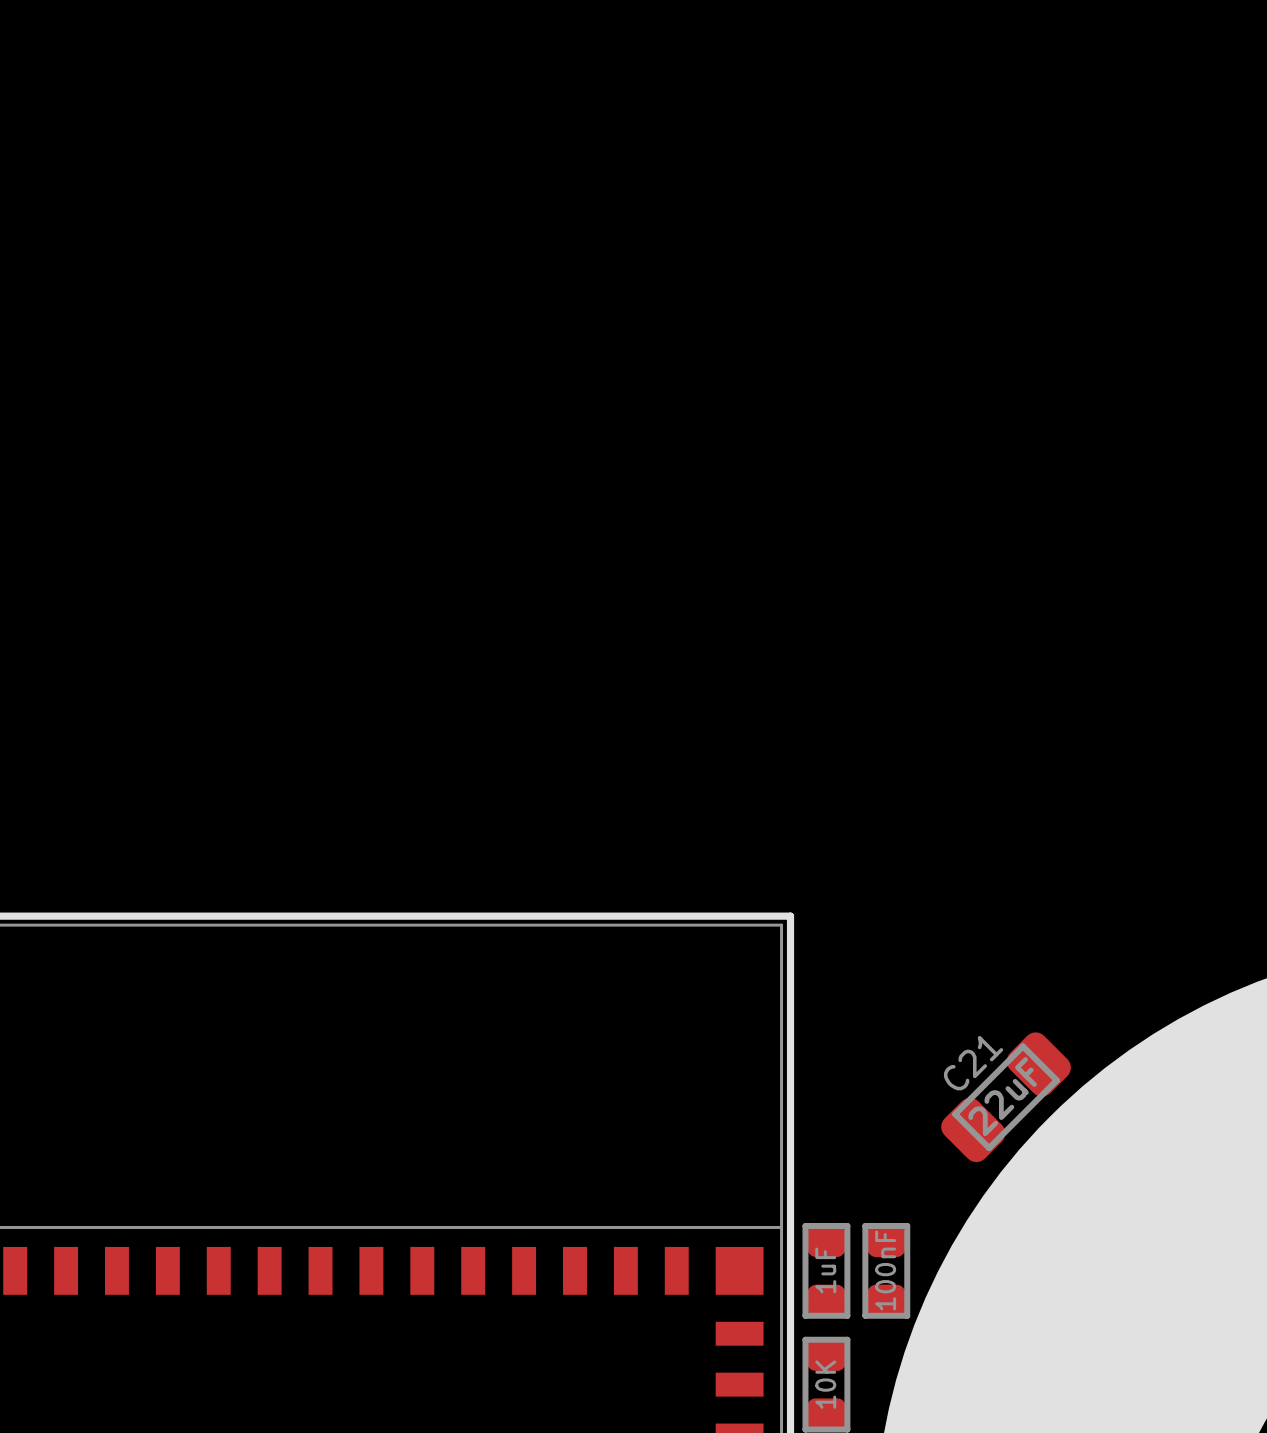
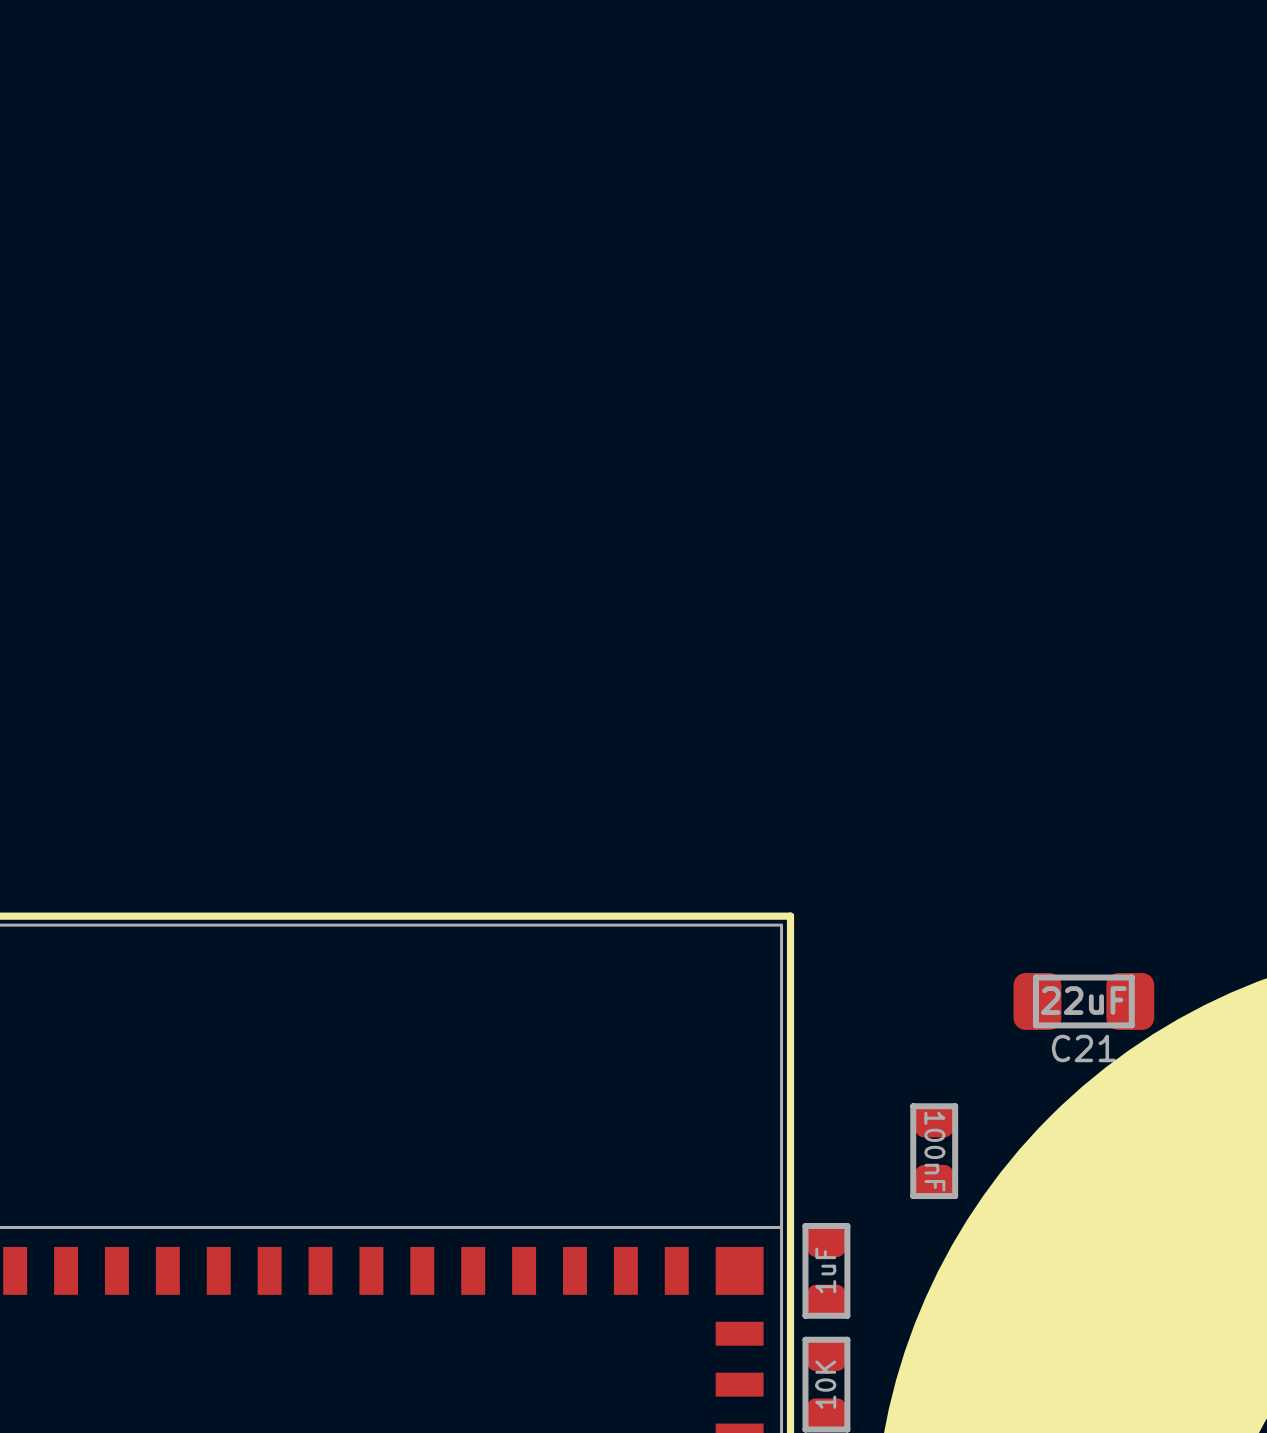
C21 rotation: 0° (1006, 1097) -> 45° clockwise (1083, 1001)
C21 position: (1006, 1097) -> (1083, 1001)
part value rotation: 0° (885, 1270) -> 180° (934, 1151)
part position: (886, 1270) -> (934, 1151)

